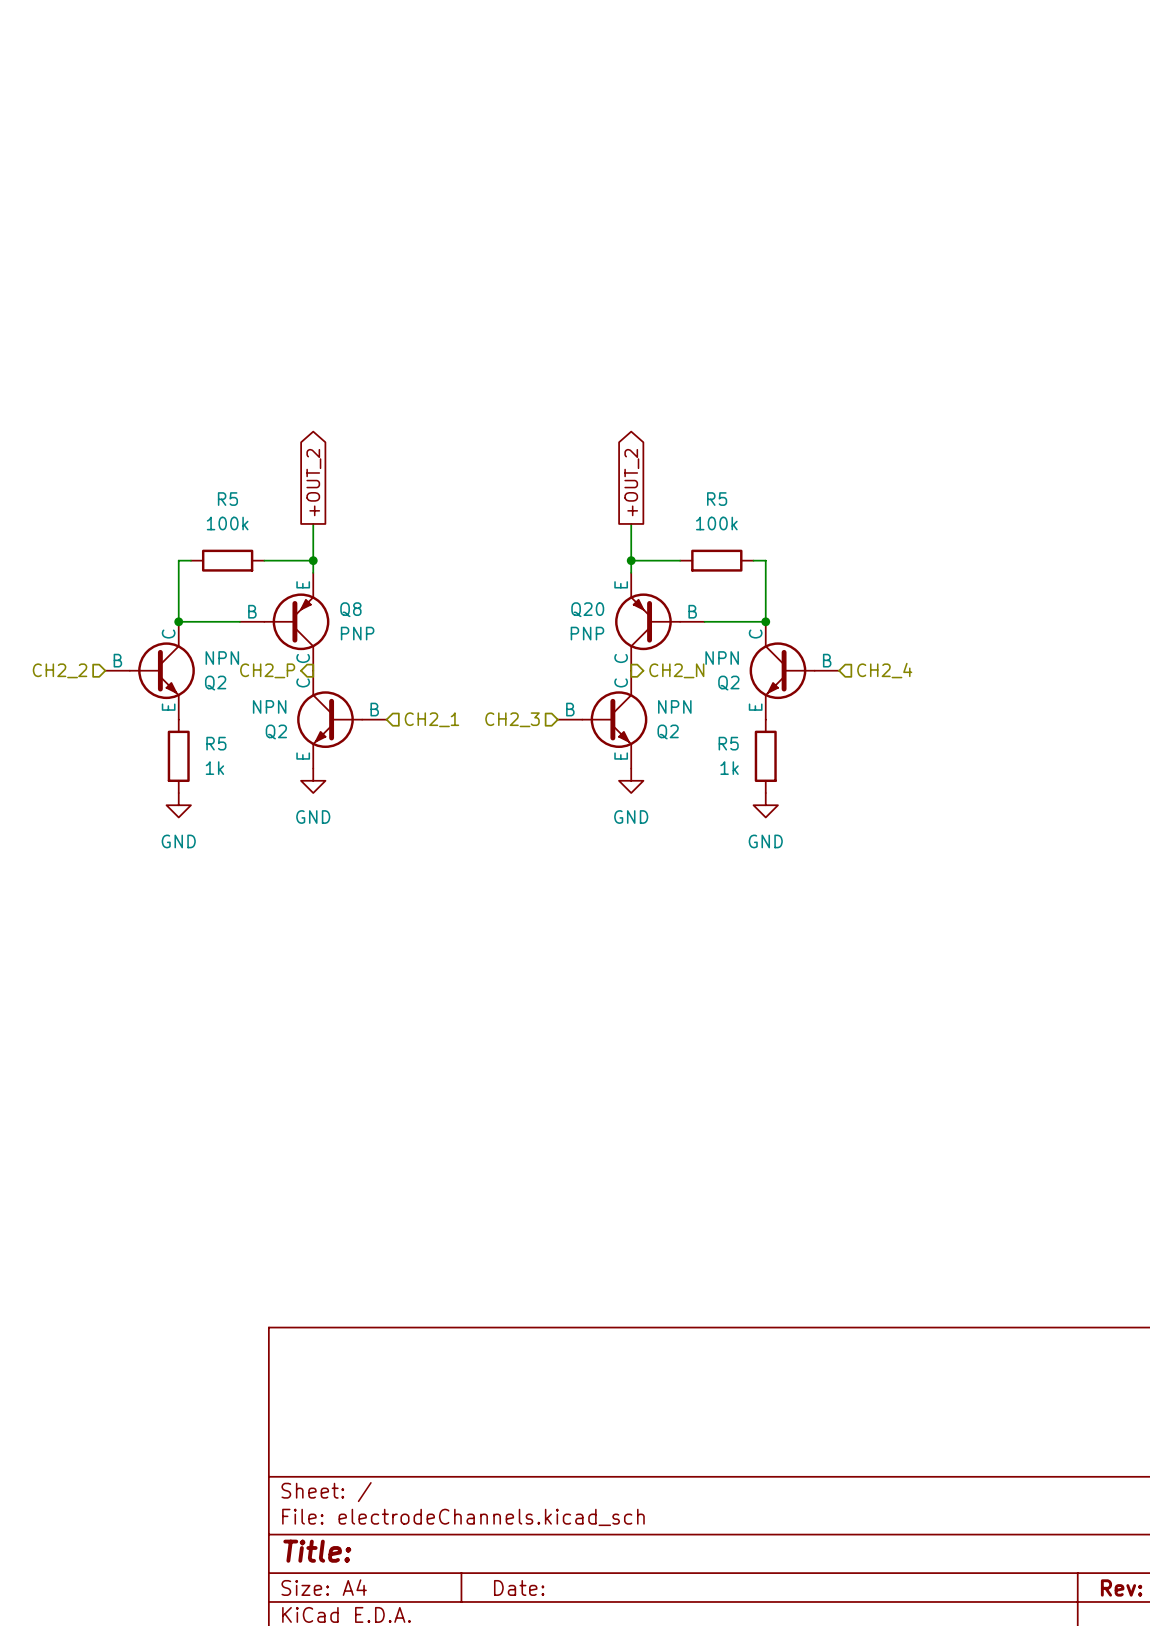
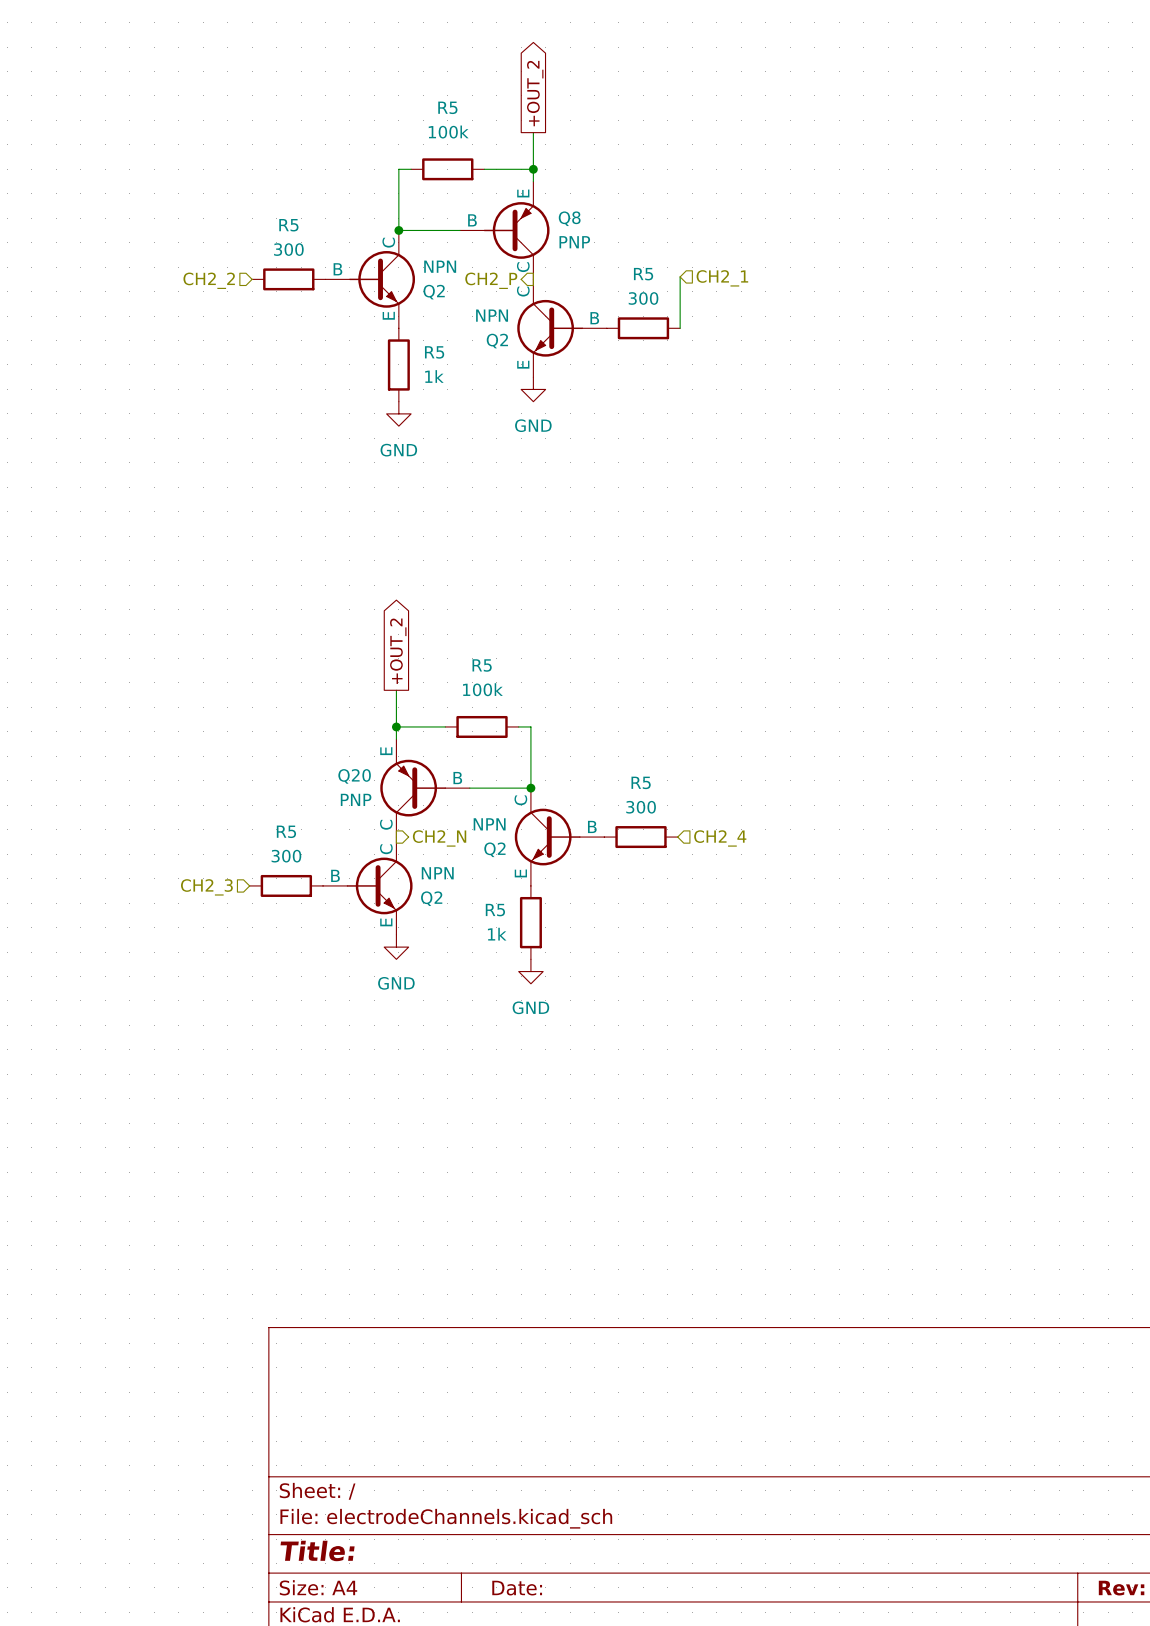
global label: none -> +OUT_2 (535, 93)
wire: none -> (533, 132) (533, 181)
wire: none -> (411, 169) (398, 169) (398, 230) (460, 230)
R5: none -> 100k (447, 169)
wire: none -> (484, 169) (533, 169)
junction: none -> (533, 169)
junction: none -> (398, 230)
wire: none -> (680, 276) (680, 328)
hierarchical label: none -> CH2_1 (722, 278)
hierarchical label: none -> CH2_2 (209, 280)
R5: none -> 300 (288, 279)
Q2: none -> NPN (370, 279)
hierarchical label: none -> CH2_P (491, 280)
Q2: none -> NPN (562, 328)
R5: none -> 300 (643, 328)
R5: none -> 1k (398, 364)
power symbol: none -> GND (533, 389)
power symbol: none -> GND (398, 413)
global label: +OUT_2 (313, 482) -> none
global label: +OUT_2 (631, 482) -> none
wire: (313, 523) (313, 572) -> (396, 690) (396, 739)
wire: (631, 523) (631, 572) -> none
wire: (190, 560) (178, 560) (178, 621) (239, 621) -> none
R5: 100k (227, 560) -> none
wire: (264, 560) (313, 560) -> (396, 726) (445, 726)
junction: (313, 560) -> none
wire: (631, 560) (680, 560) -> none
junction: (631, 560) -> none
R5: 100k (716, 560) -> none
wire: (753, 560) (765, 560) (765, 621) (704, 621) -> none
junction: (178, 621) -> none
Q8 position: (284, 621) -> (504, 230)
Q20 position: (659, 621) -> (425, 788)
junction: (765, 621) -> none
global label: none -> +OUT_2 (398, 651)
hierarchical label: CH2_2 (60, 670) -> none
Q2: NPN (150, 670) -> none
hierarchical label: CH2_P (267, 670) -> none
hierarchical label: CH2_N (676, 670) -> none
Q2: NPN (794, 670) -> none
hierarchical label position: CH2_4 (884, 670) -> CH2_4 (720, 838)
Q2: NPN (341, 719) -> none
hierarchical label: CH2_1 (431, 719) -> none
hierarchical label: CH2_3 (512, 719) -> none
Q2: NPN (602, 719) -> none
junction: none -> (396, 726)
R5: none -> 100k (482, 726)
wire: none -> (518, 726) (530, 726) (530, 788) (469, 788)
R5: 1k (178, 756) -> none
R5: 1k (765, 756) -> none
power symbol: GND (313, 780) -> none
power symbol: GND (631, 780) -> none
junction: none -> (530, 788)
power symbol: GND (178, 805) -> none
power symbol: GND (765, 805) -> none
hierarchical label: none -> CH2_N (439, 838)
Q2: none -> NPN (559, 837)
R5: none -> 300 (641, 837)
R5: none -> 300 (286, 885)
Q2: none -> NPN (367, 885)
hierarchical label: none -> CH2_3 (206, 887)
R5: none -> 1k (530, 922)
power symbol: none -> GND (396, 947)
power symbol: none -> GND (530, 971)

